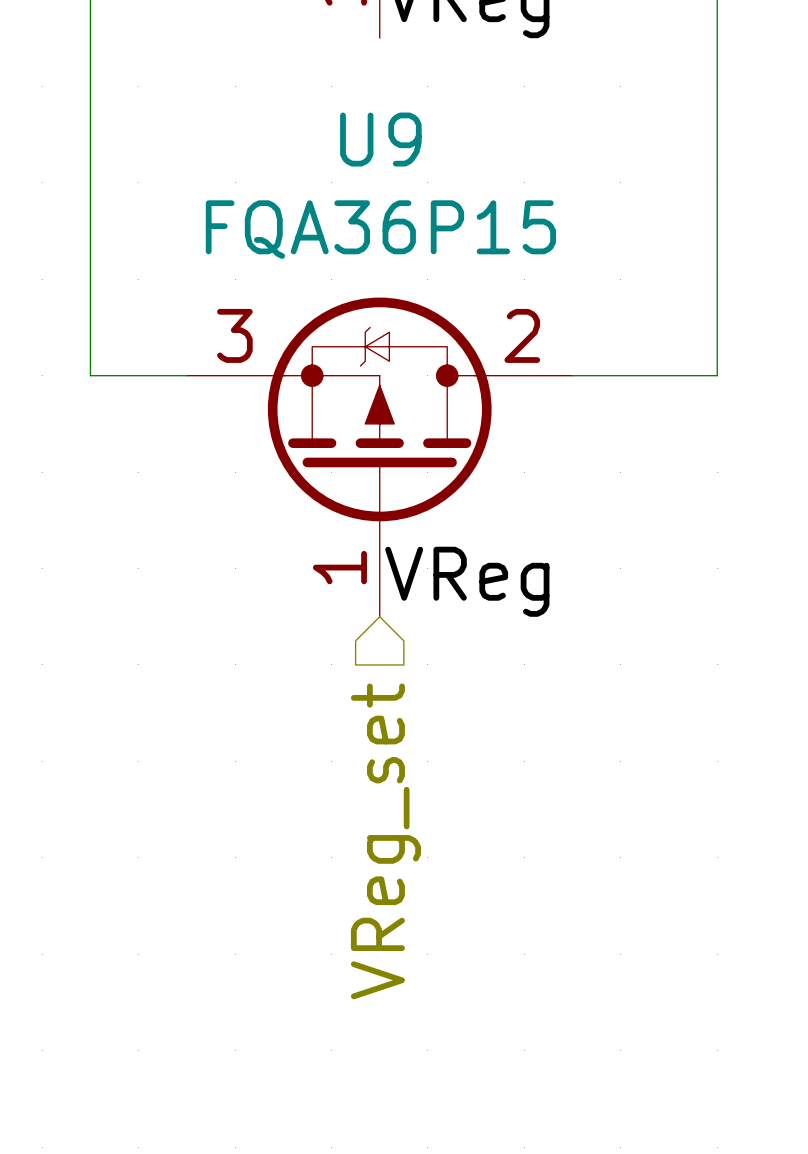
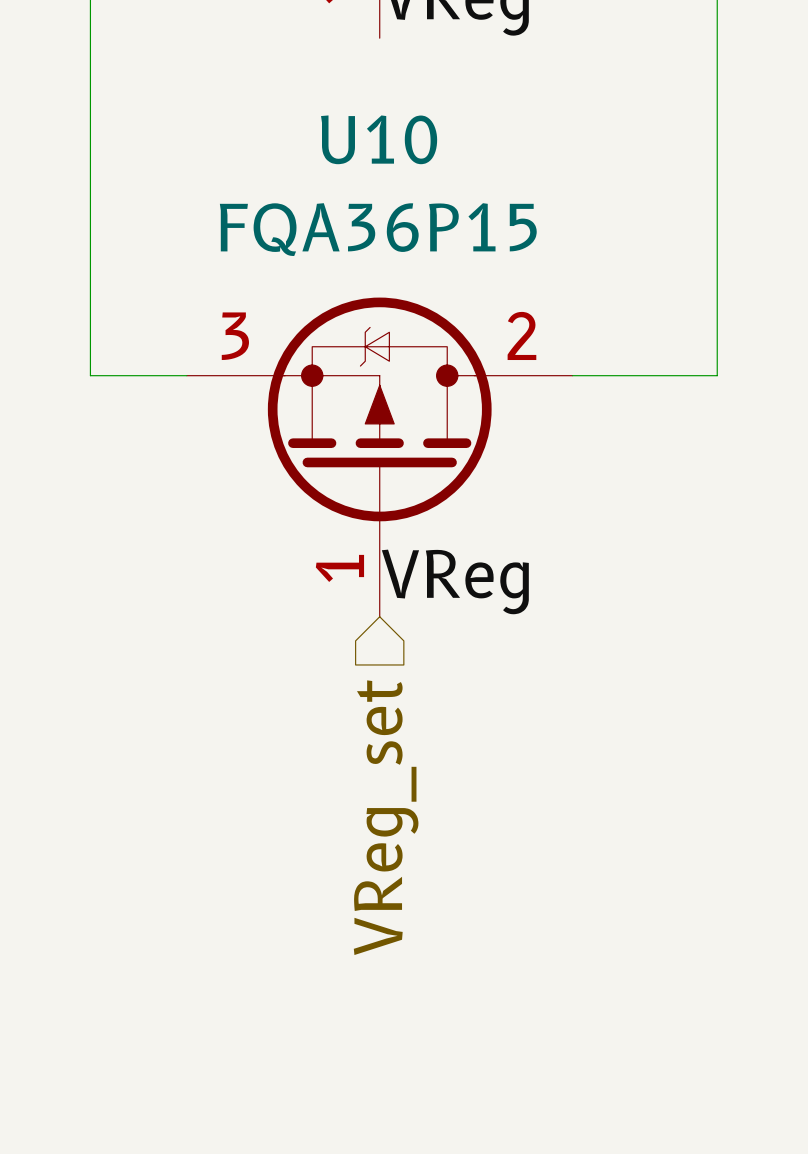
U9 name: U9 (380, 139) -> U10 (379, 139)

